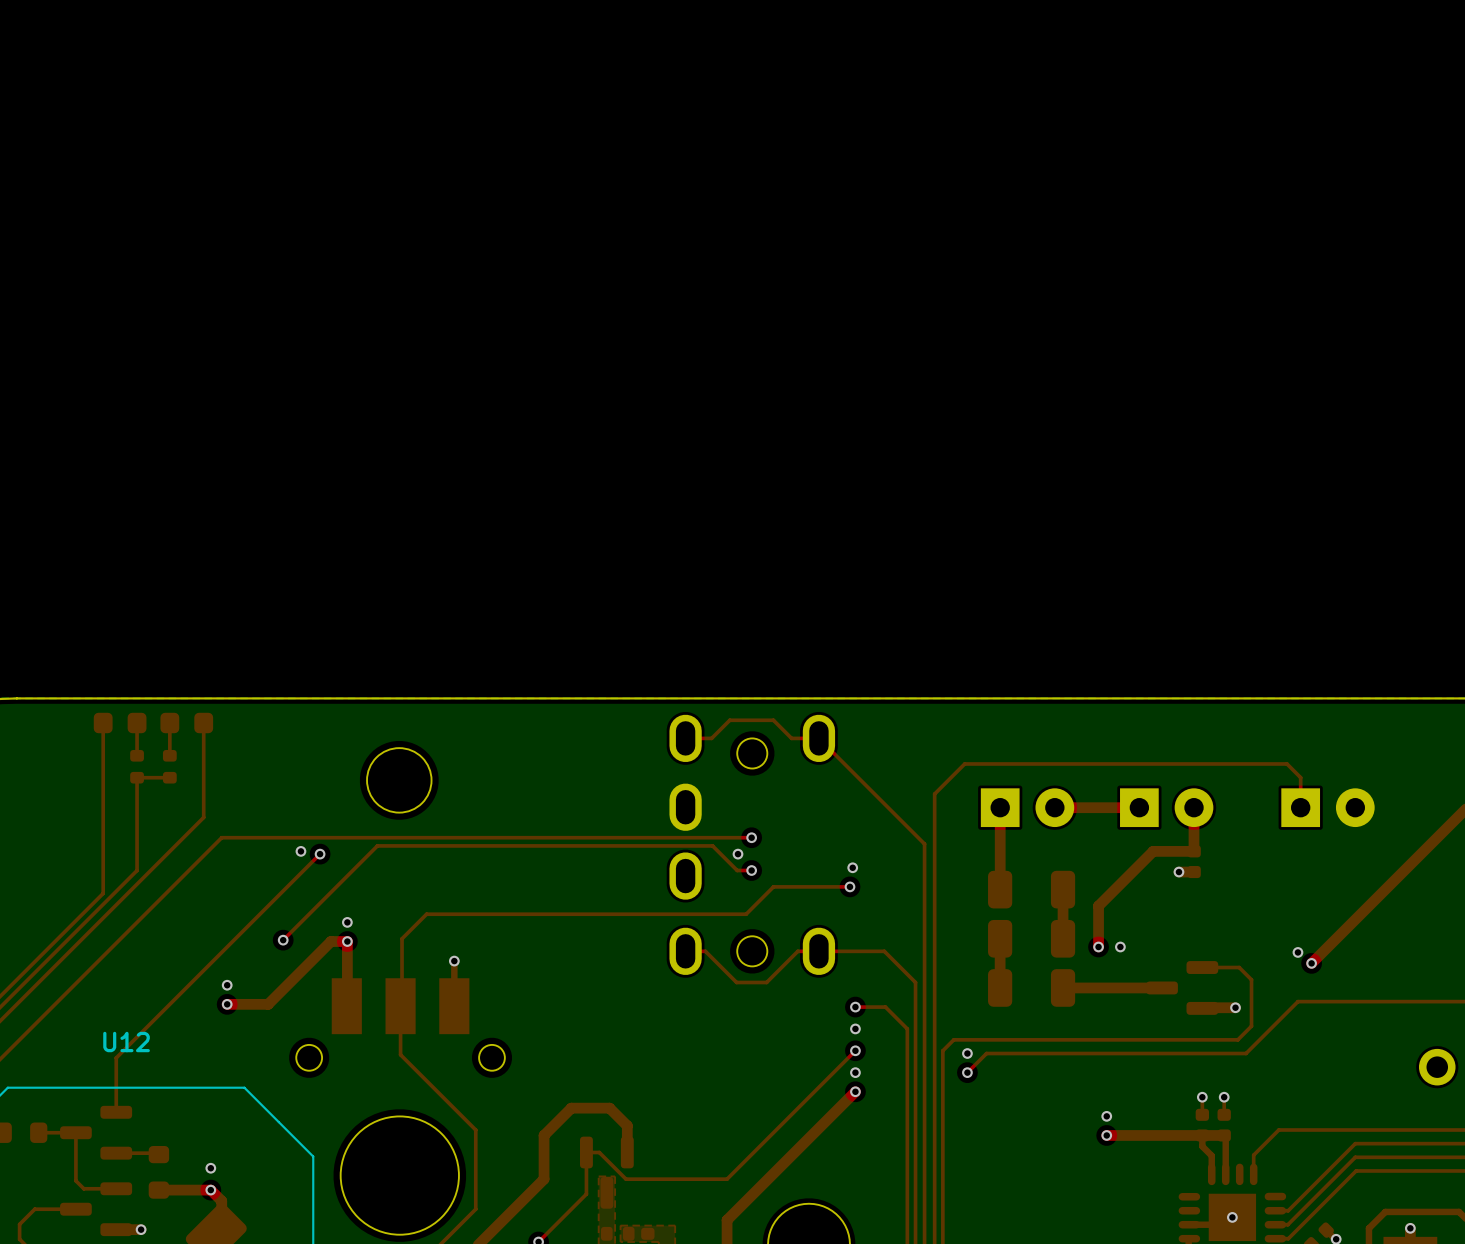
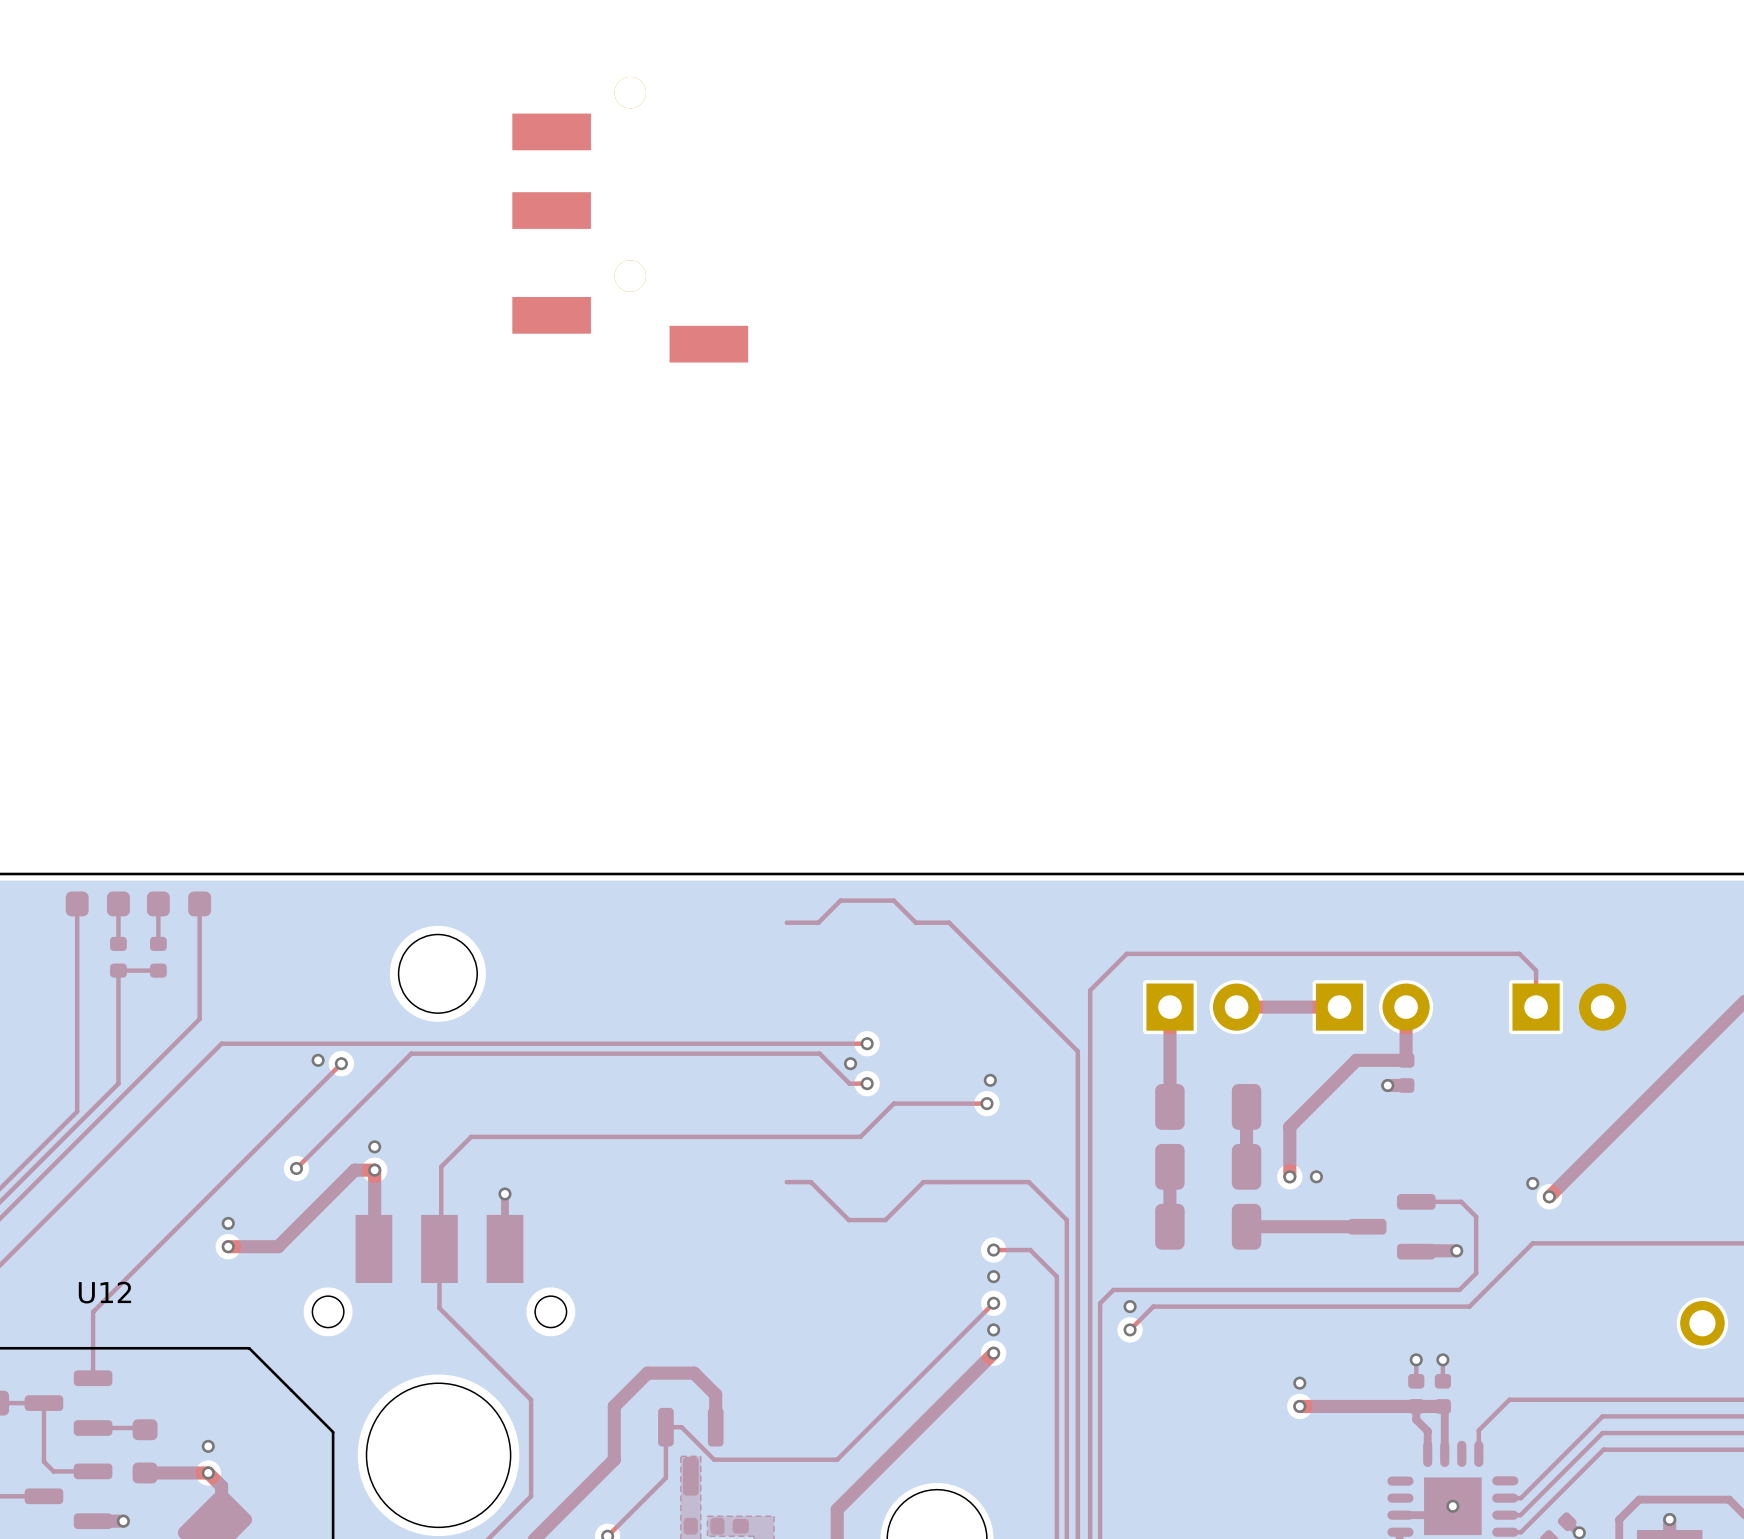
part: none -> (630, 219)
part: (752, 844) -> none

